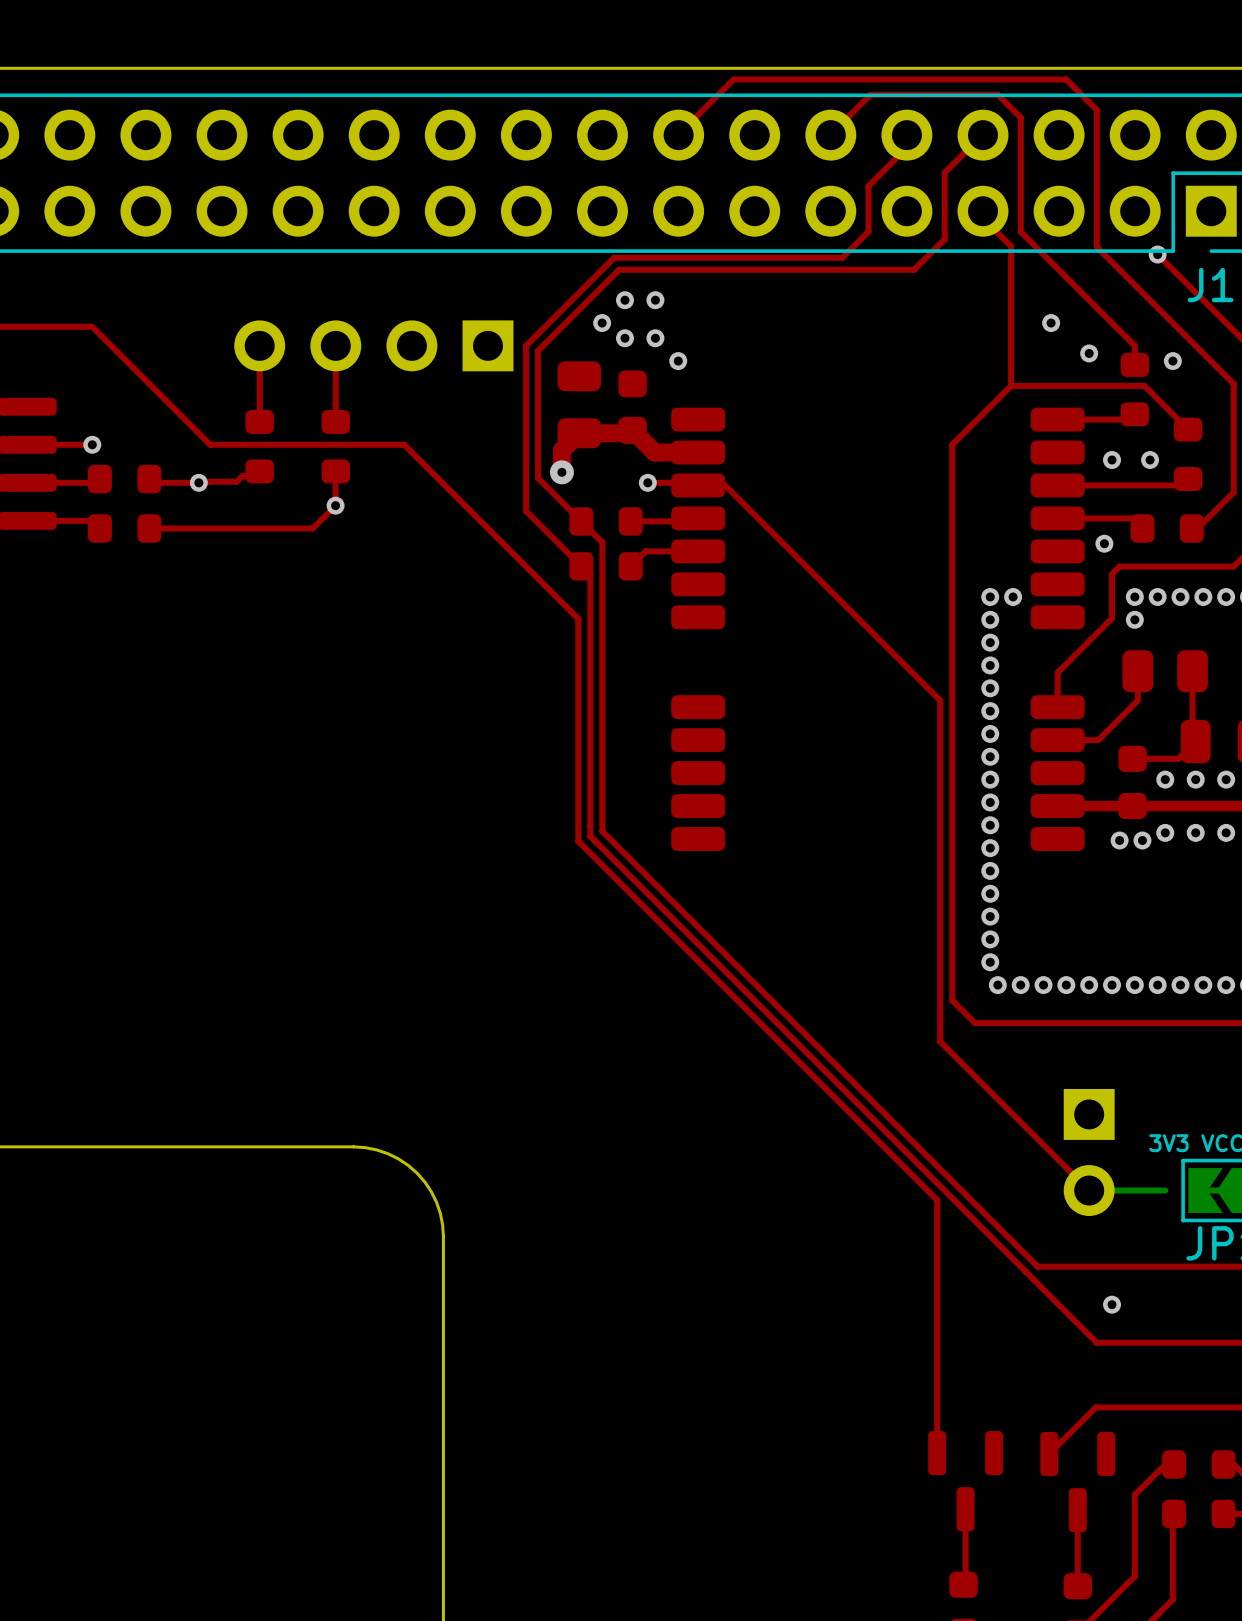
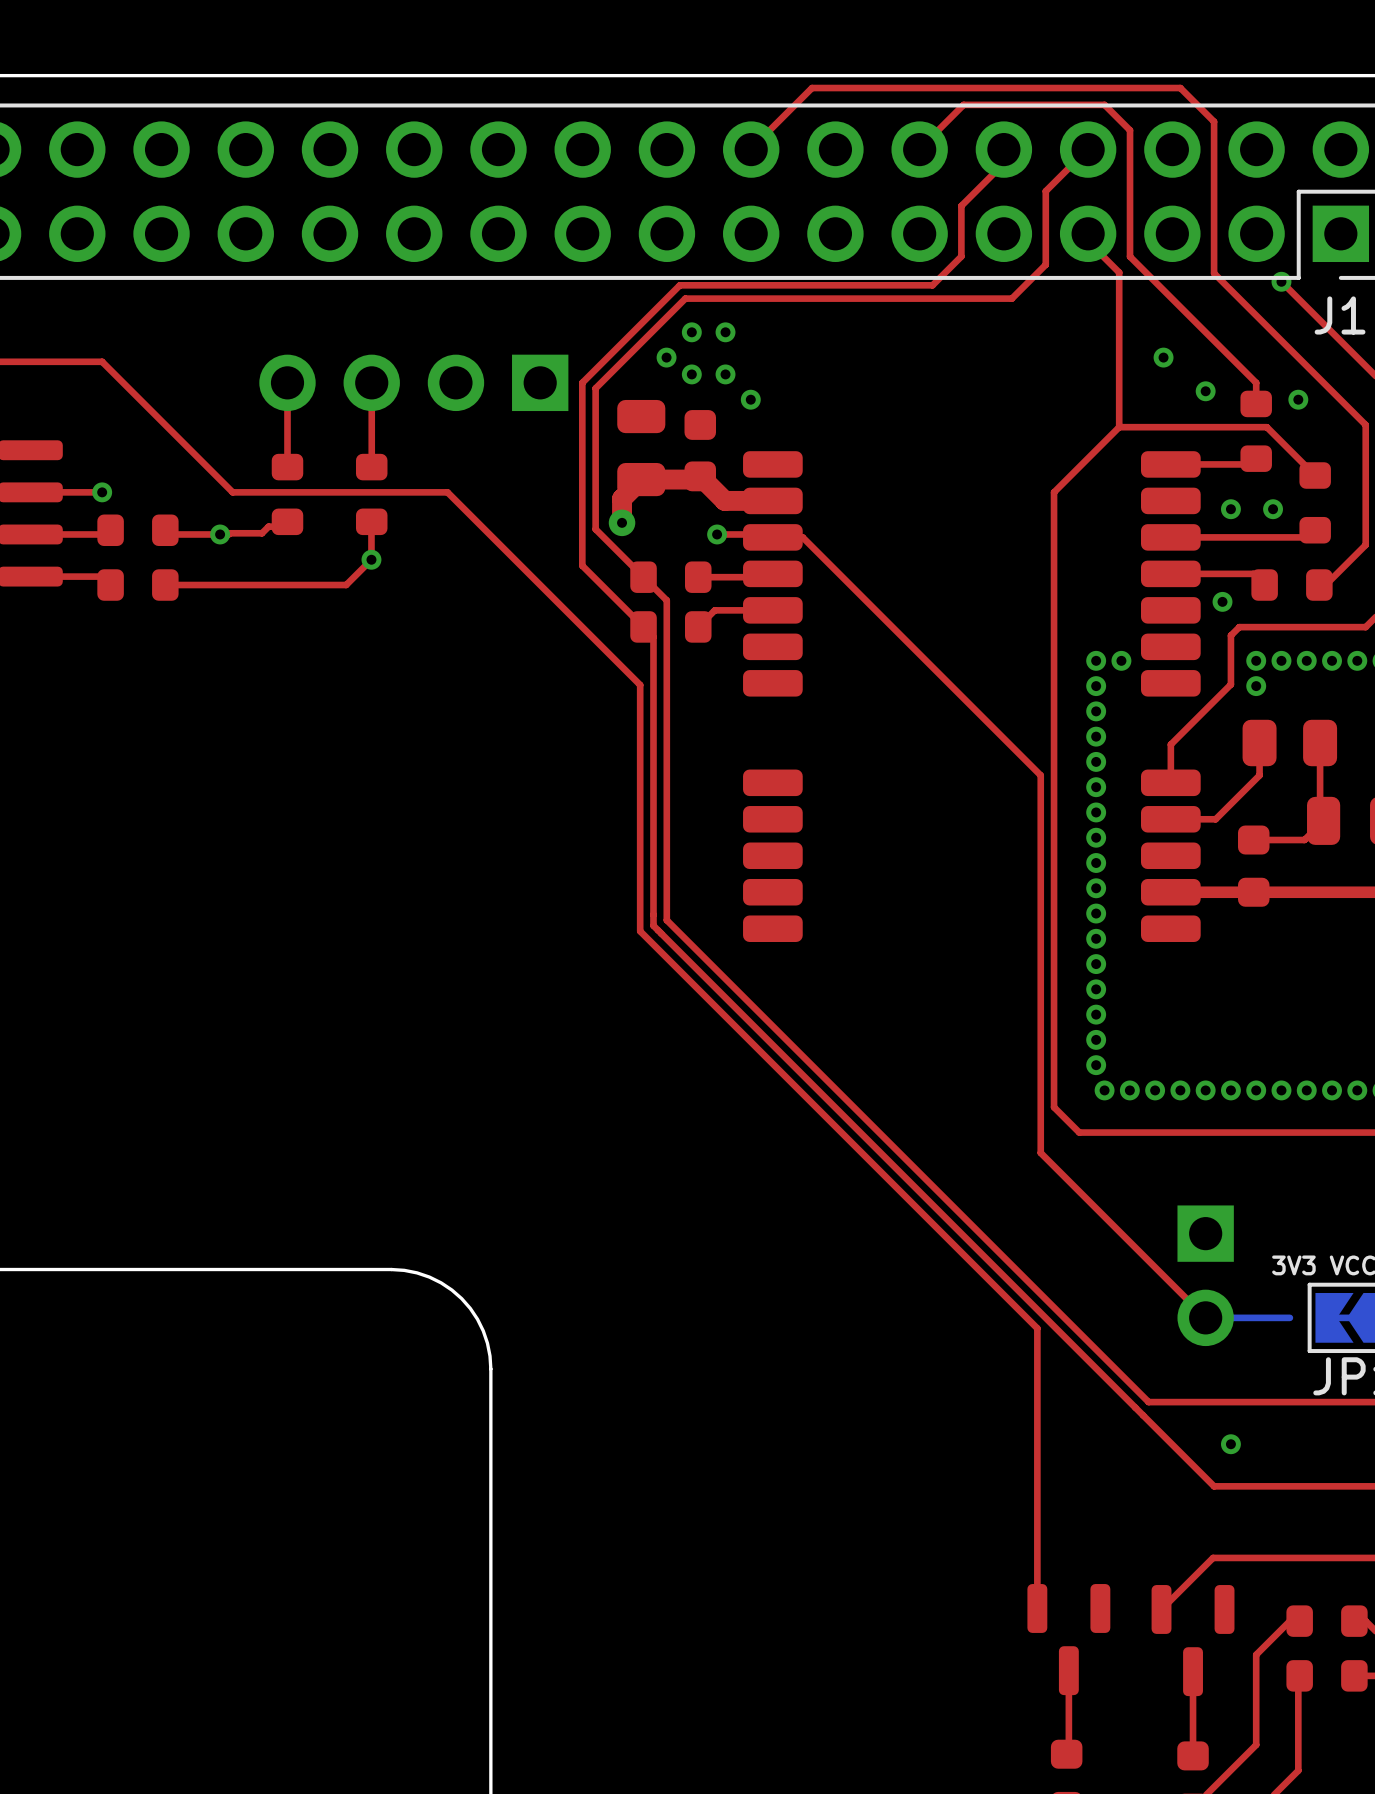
via: (1165, 779) -> none
via: (1195, 779) -> none
via: (1226, 779) -> none
via: (1165, 832) -> none
via: (1195, 832) -> none
via: (1226, 832) -> none
via: (1119, 840) -> none
via: (1142, 840) -> none

